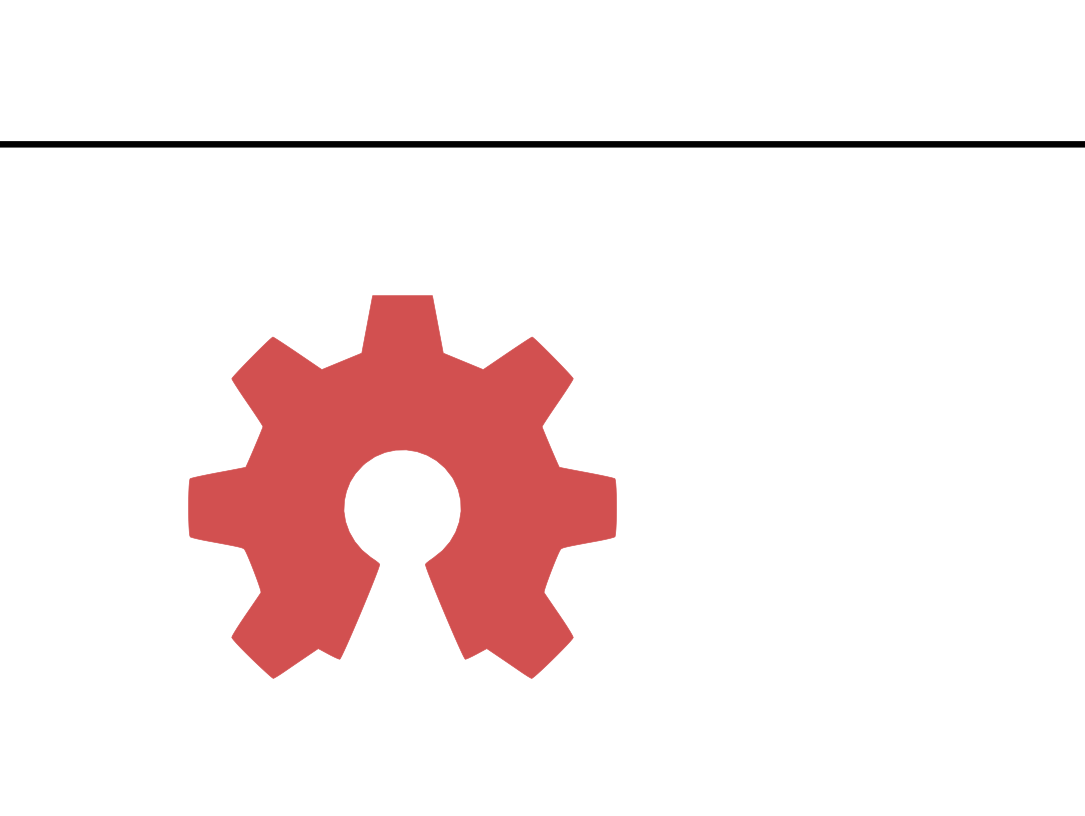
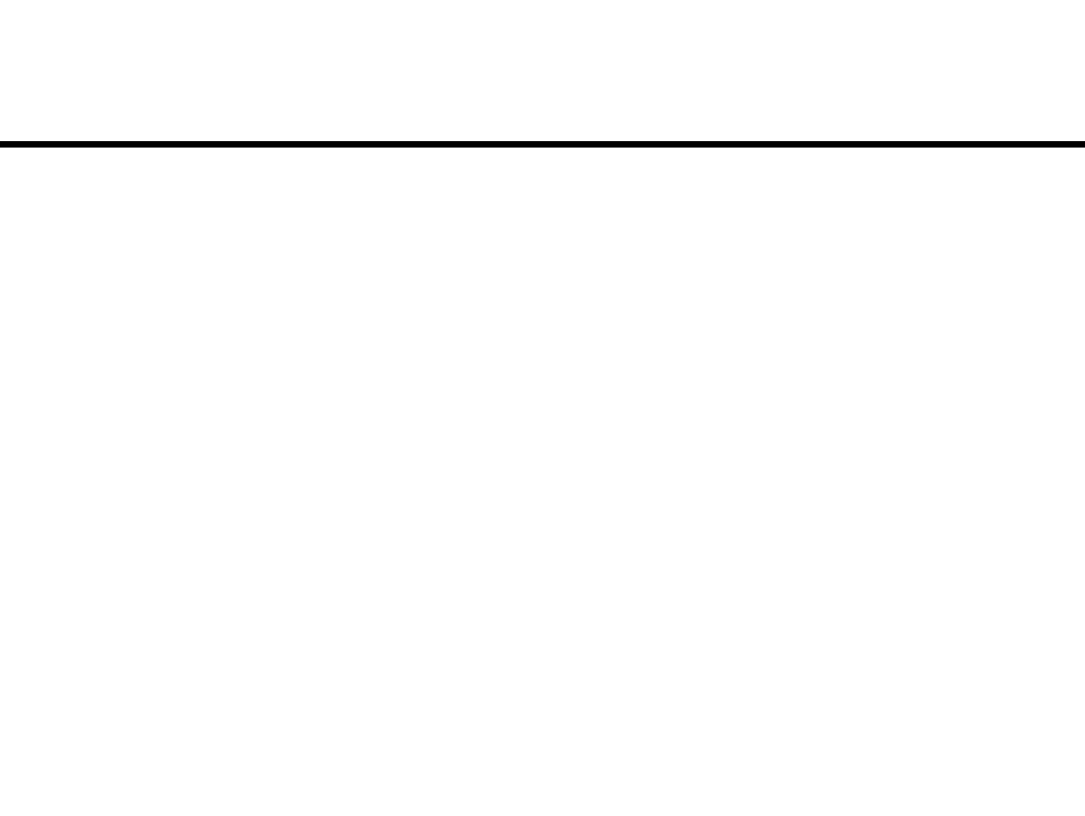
drawing: [188, 295, 617, 679] -> none

